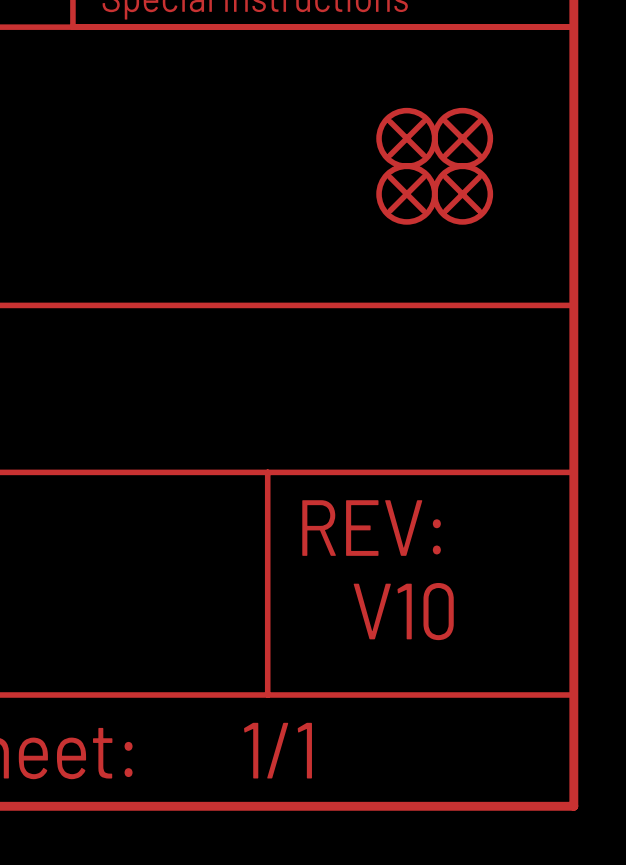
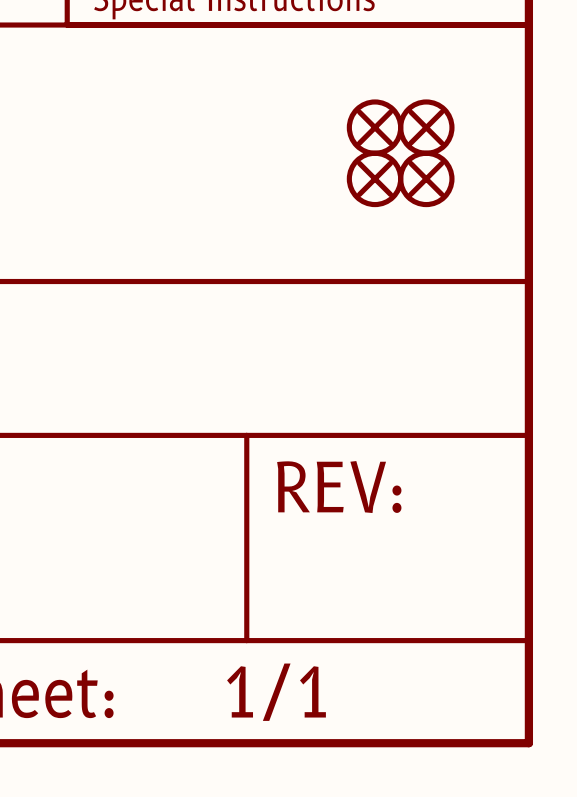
text: V10 (403, 611) -> none

